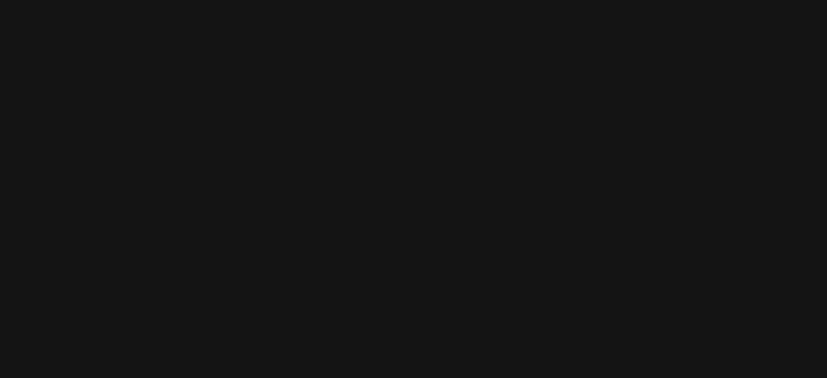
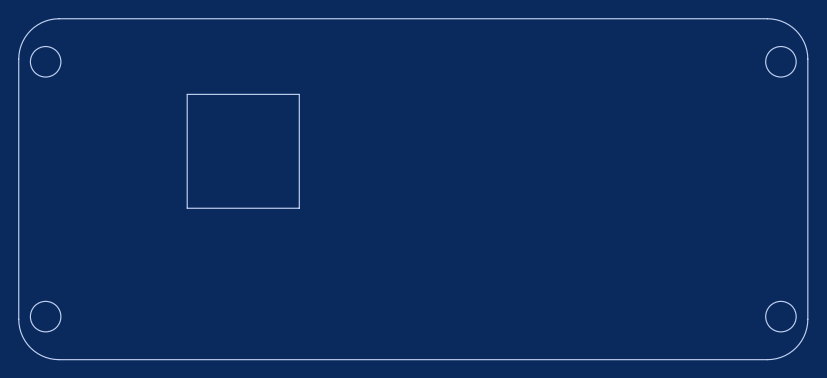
board edge: none -> (59, 18) (767, 18) (784, 22) (792, 27) (801, 37) (807, 54) (807, 319) (803, 336) (799, 344) (788, 353) (776, 358) (767, 359) (59, 359) (41, 355) (33, 350) (24, 340) (19, 323) (18, 59) (22, 41) (30, 30) (41, 22) (59, 18)
round board edge: none -> [29, 46, 62, 78]
round board edge: none -> [765, 46, 797, 78]
board edge: none -> (187, 94) (299, 94) (299, 208) (187, 208) (187, 94)
round board edge: none -> [29, 300, 62, 333]
round board edge: none -> [765, 300, 797, 333]

